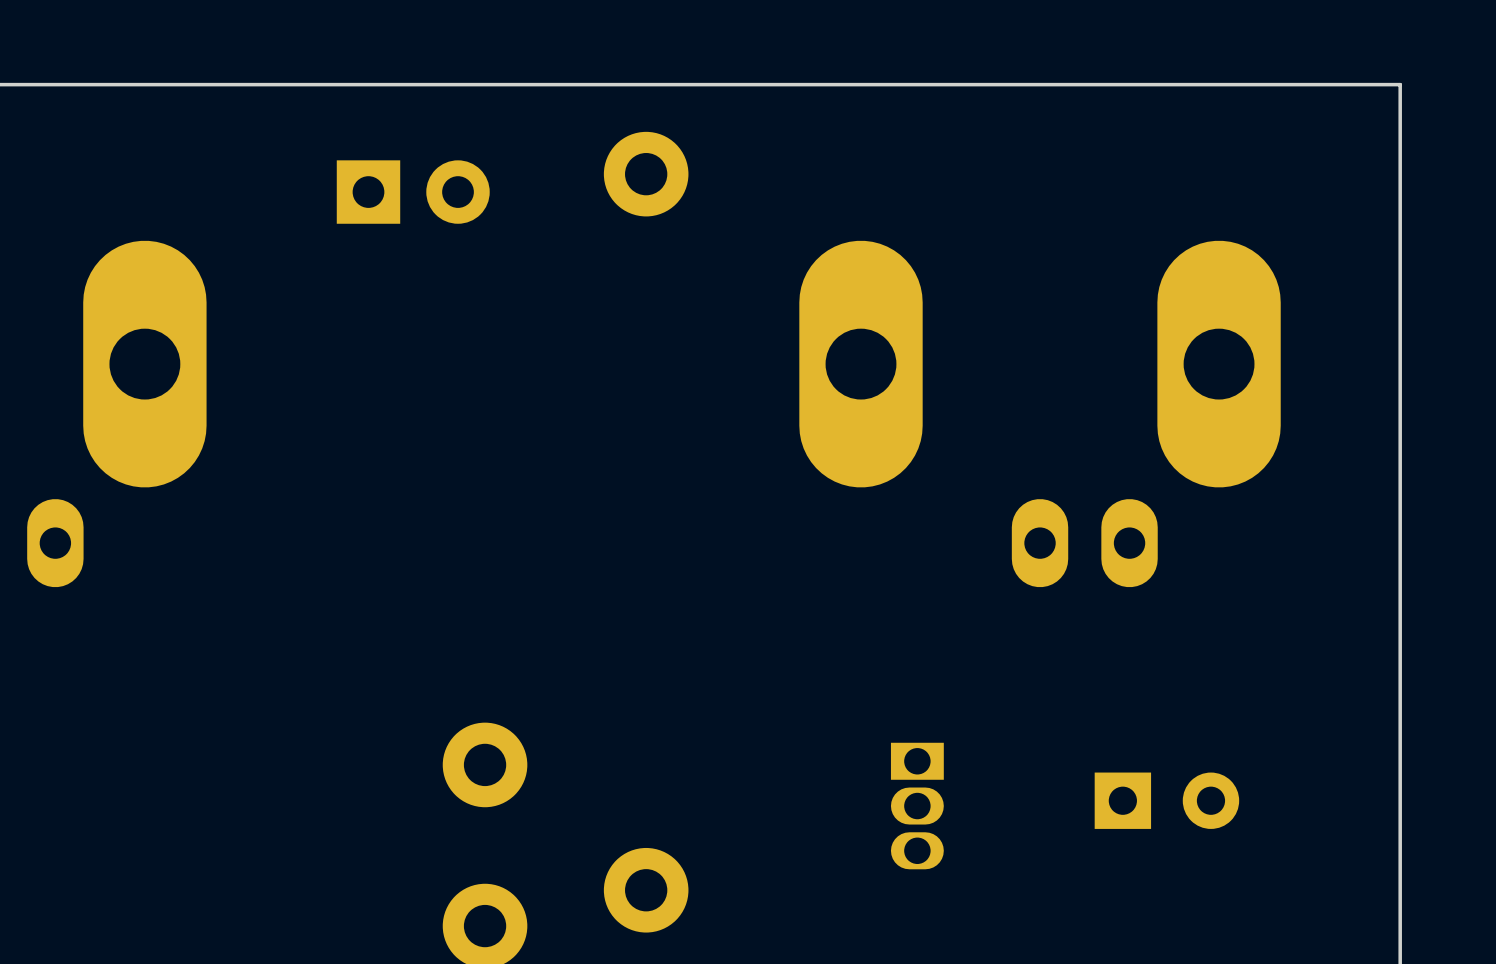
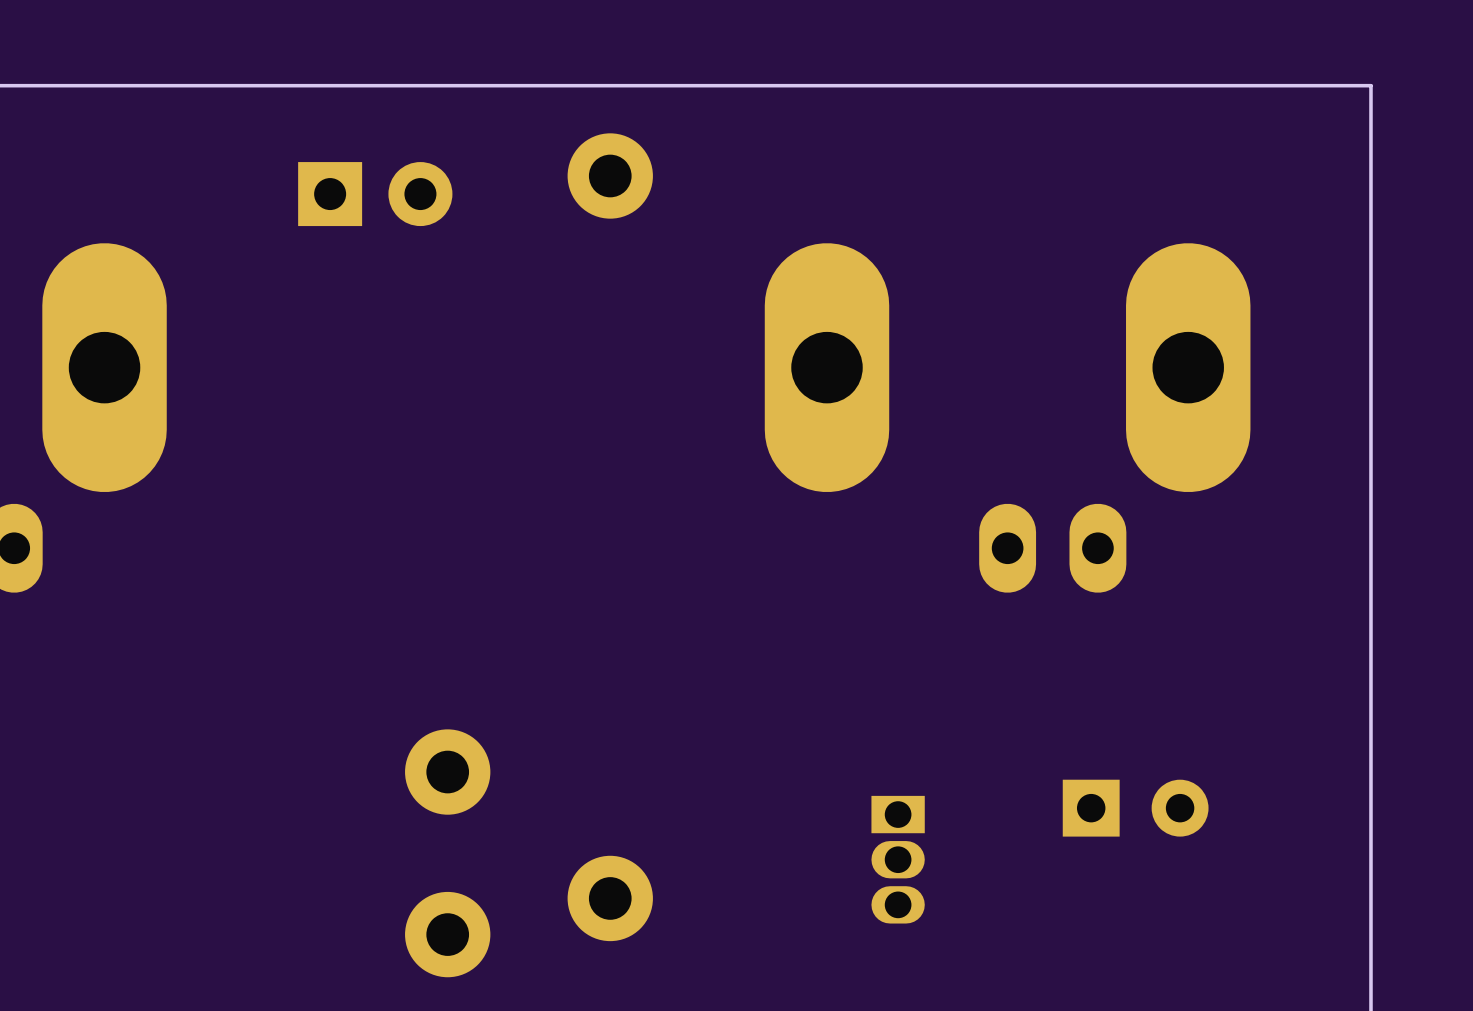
part position: (917, 806) -> (898, 859)

